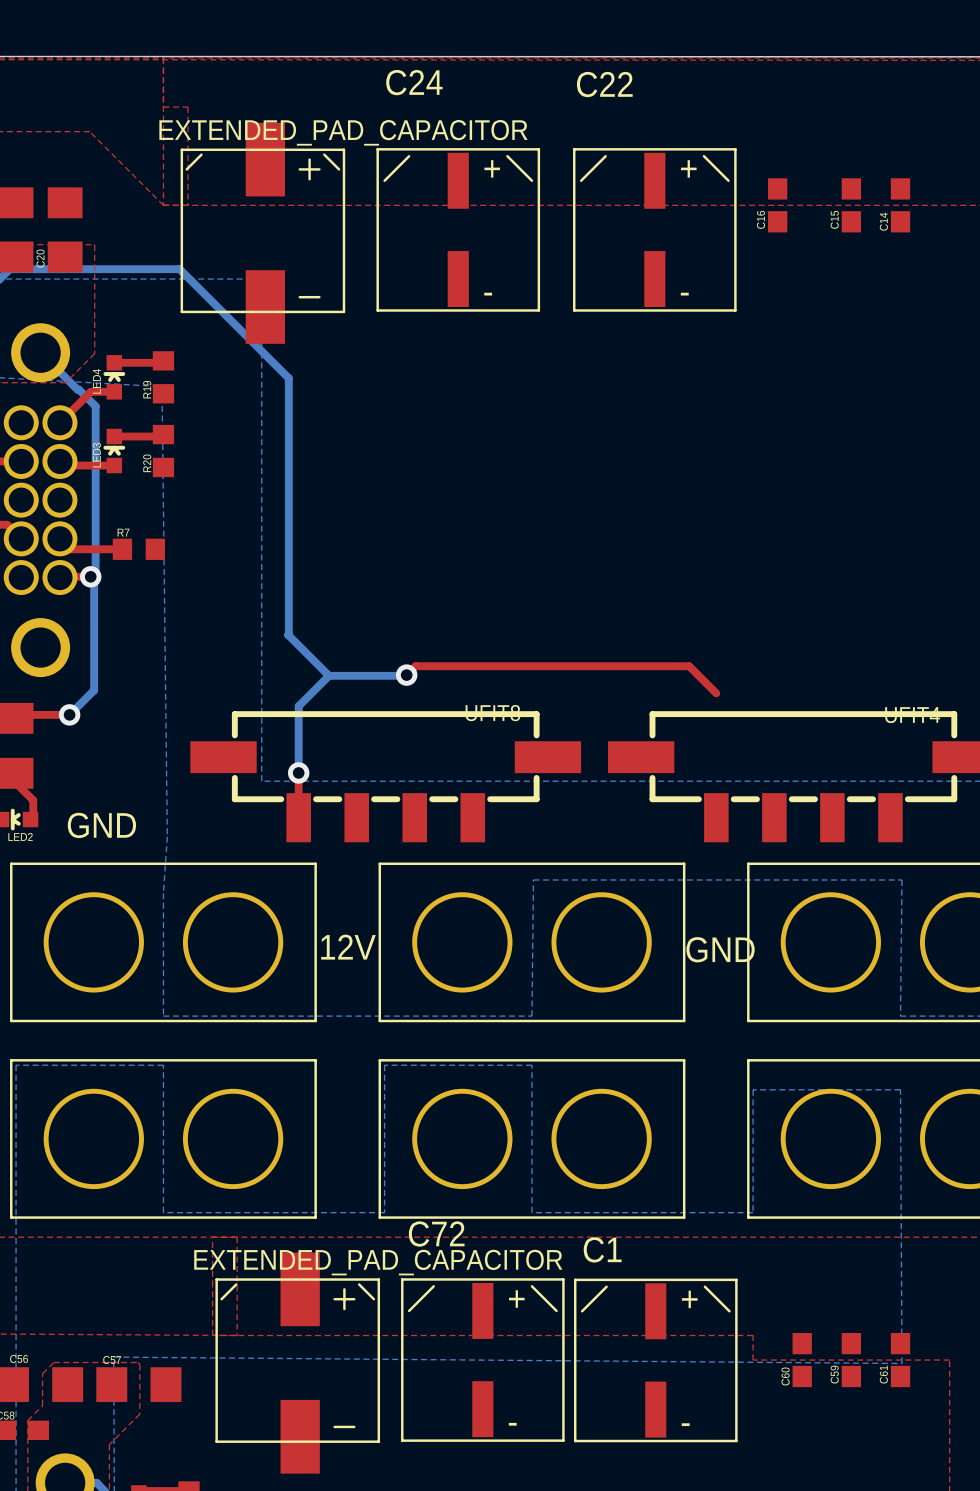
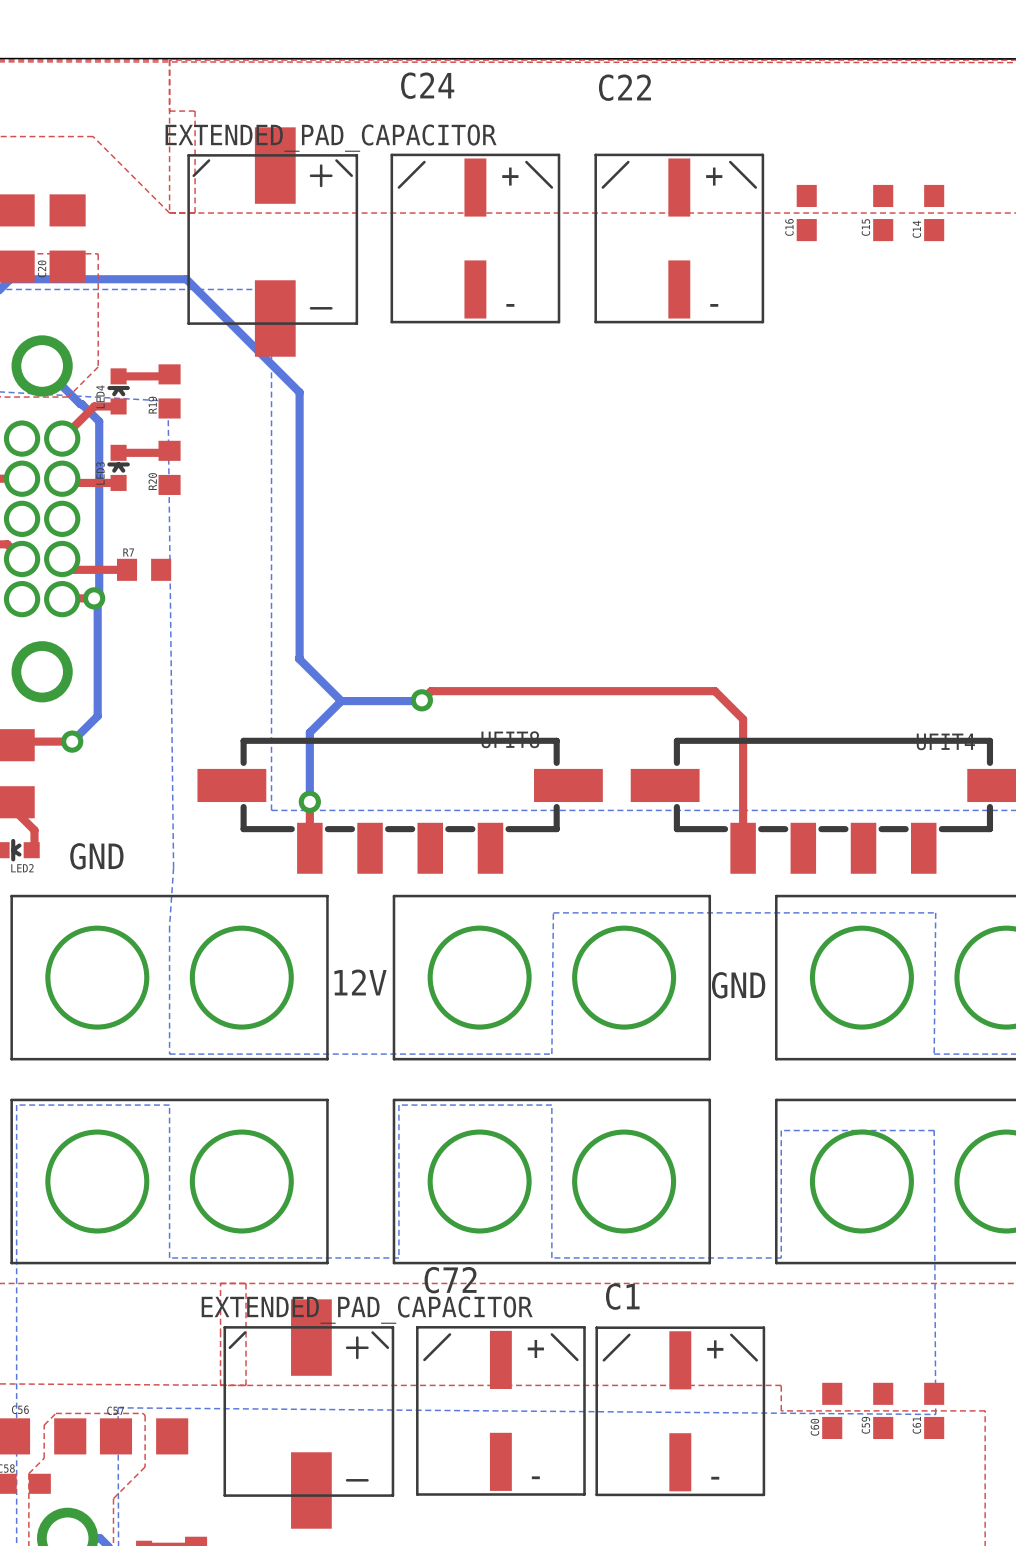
top track: none -> (743, 719) (743, 848)

